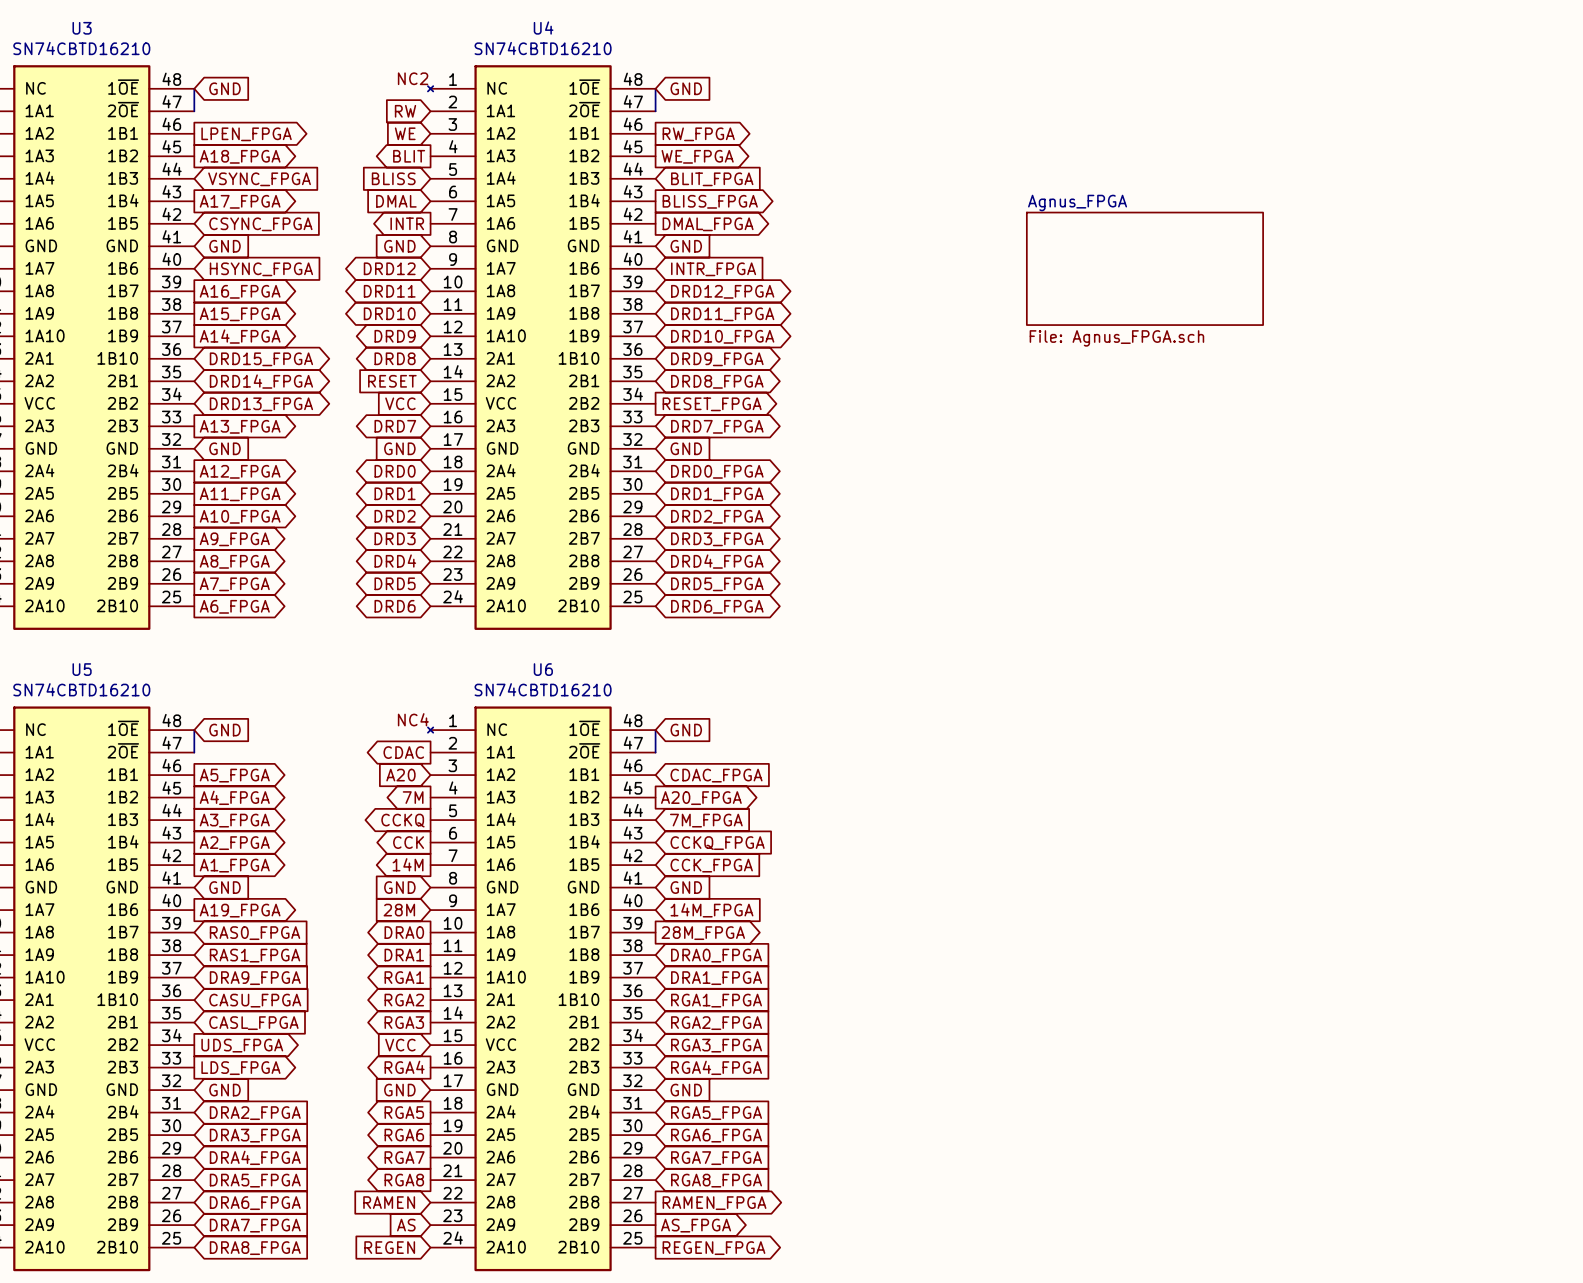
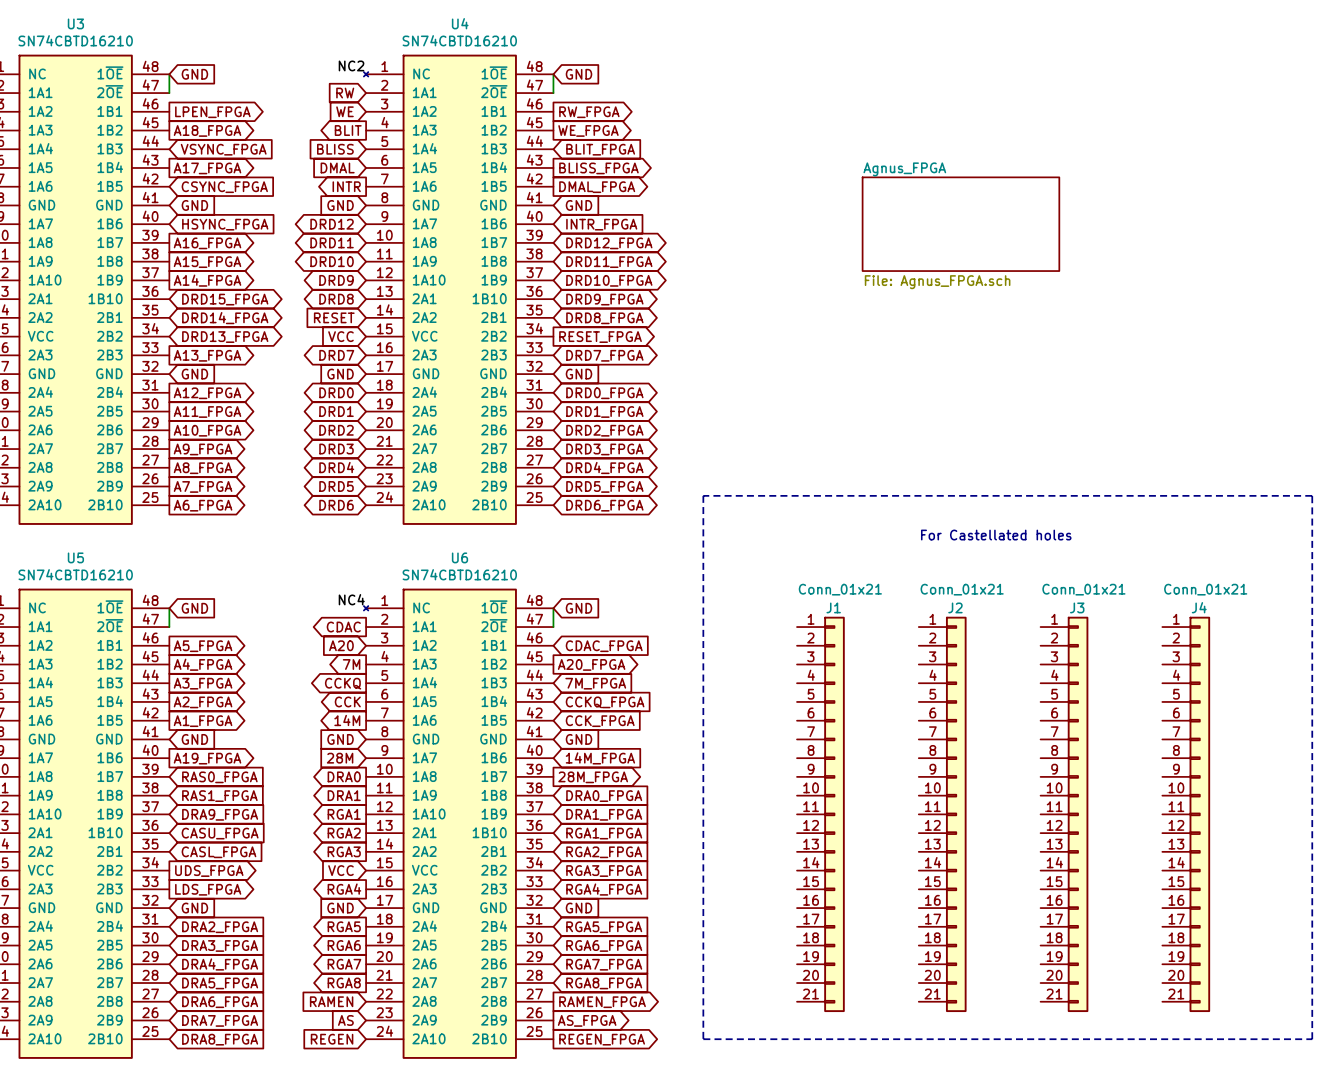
line: none -> (703, 495) (703, 1039) (1312, 1039) (1312, 495) (703, 495)
text: none -> For Castellated holes (996, 535)
J1: none -> Conn_01x21 (820, 814)
J2: none -> Conn_01x21 (942, 814)
J3: none -> Conn_01x21 (1064, 814)
J4: none -> Conn_01x21 (1186, 814)

